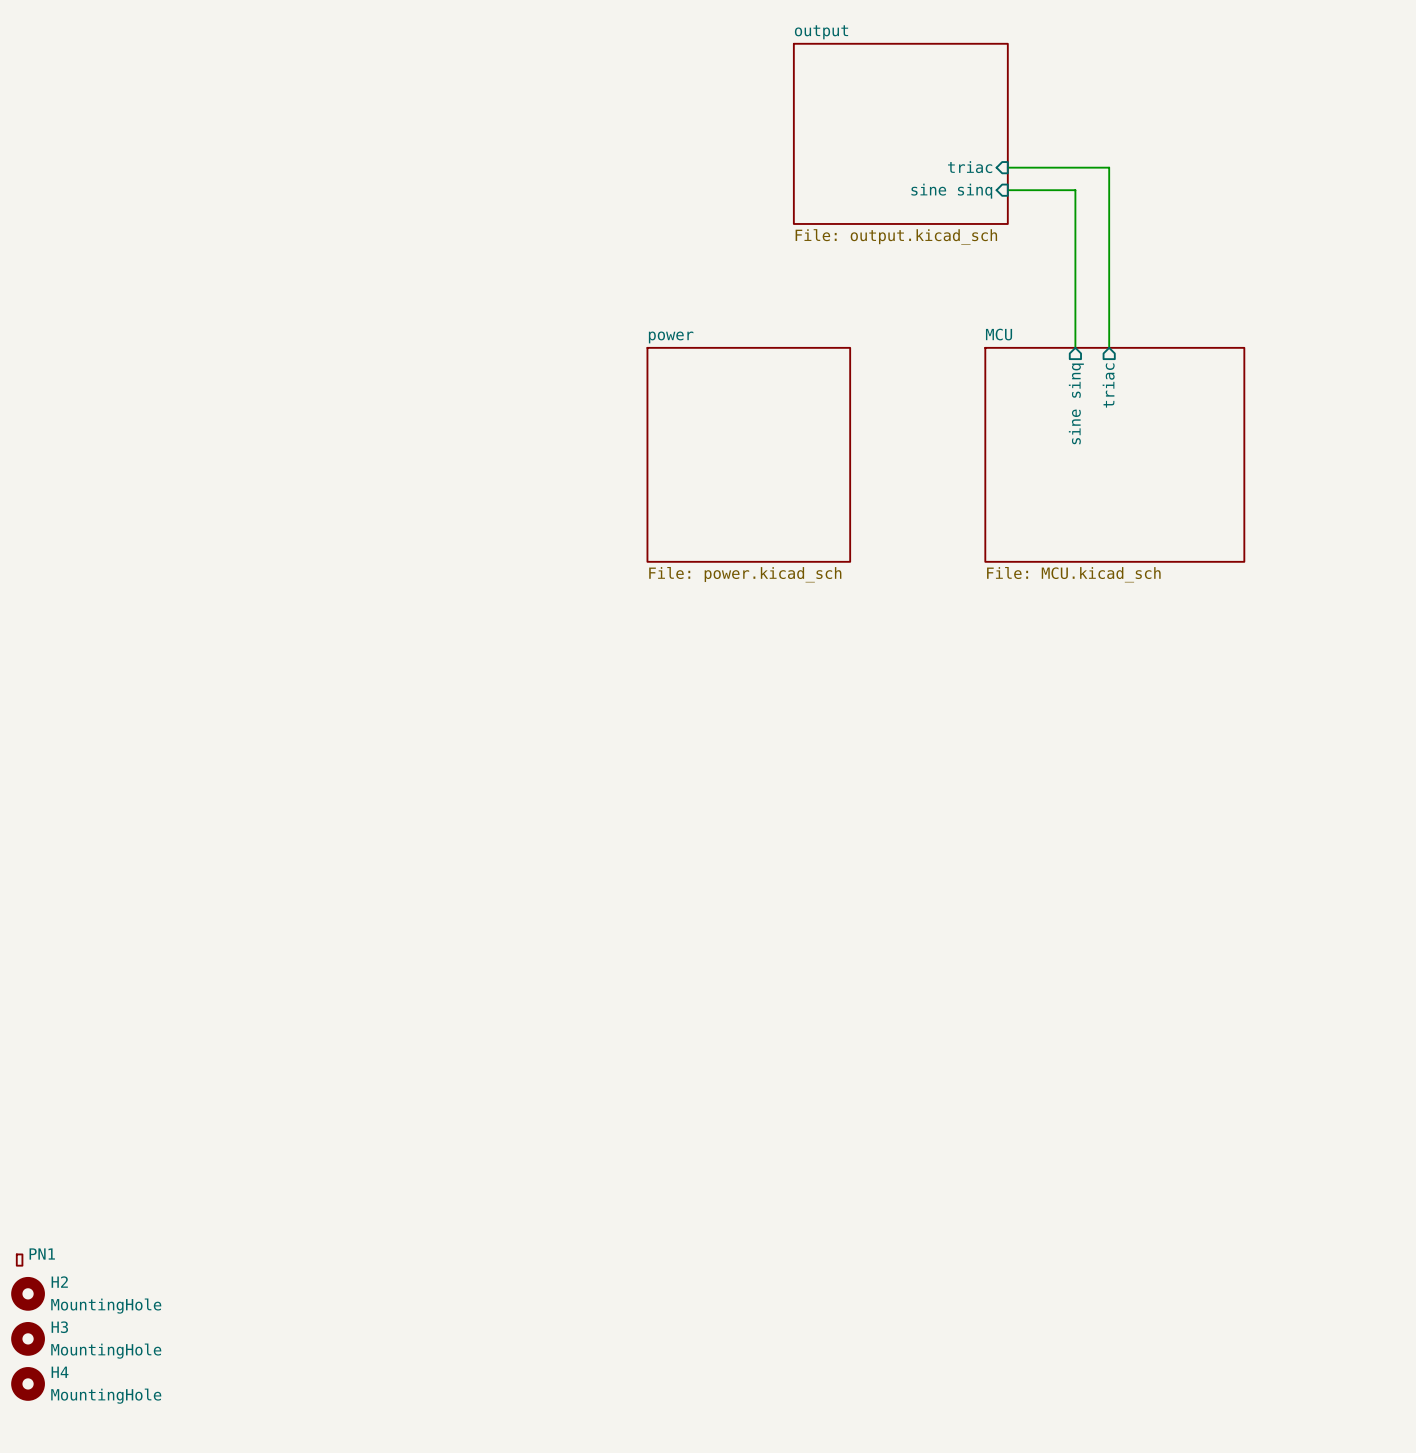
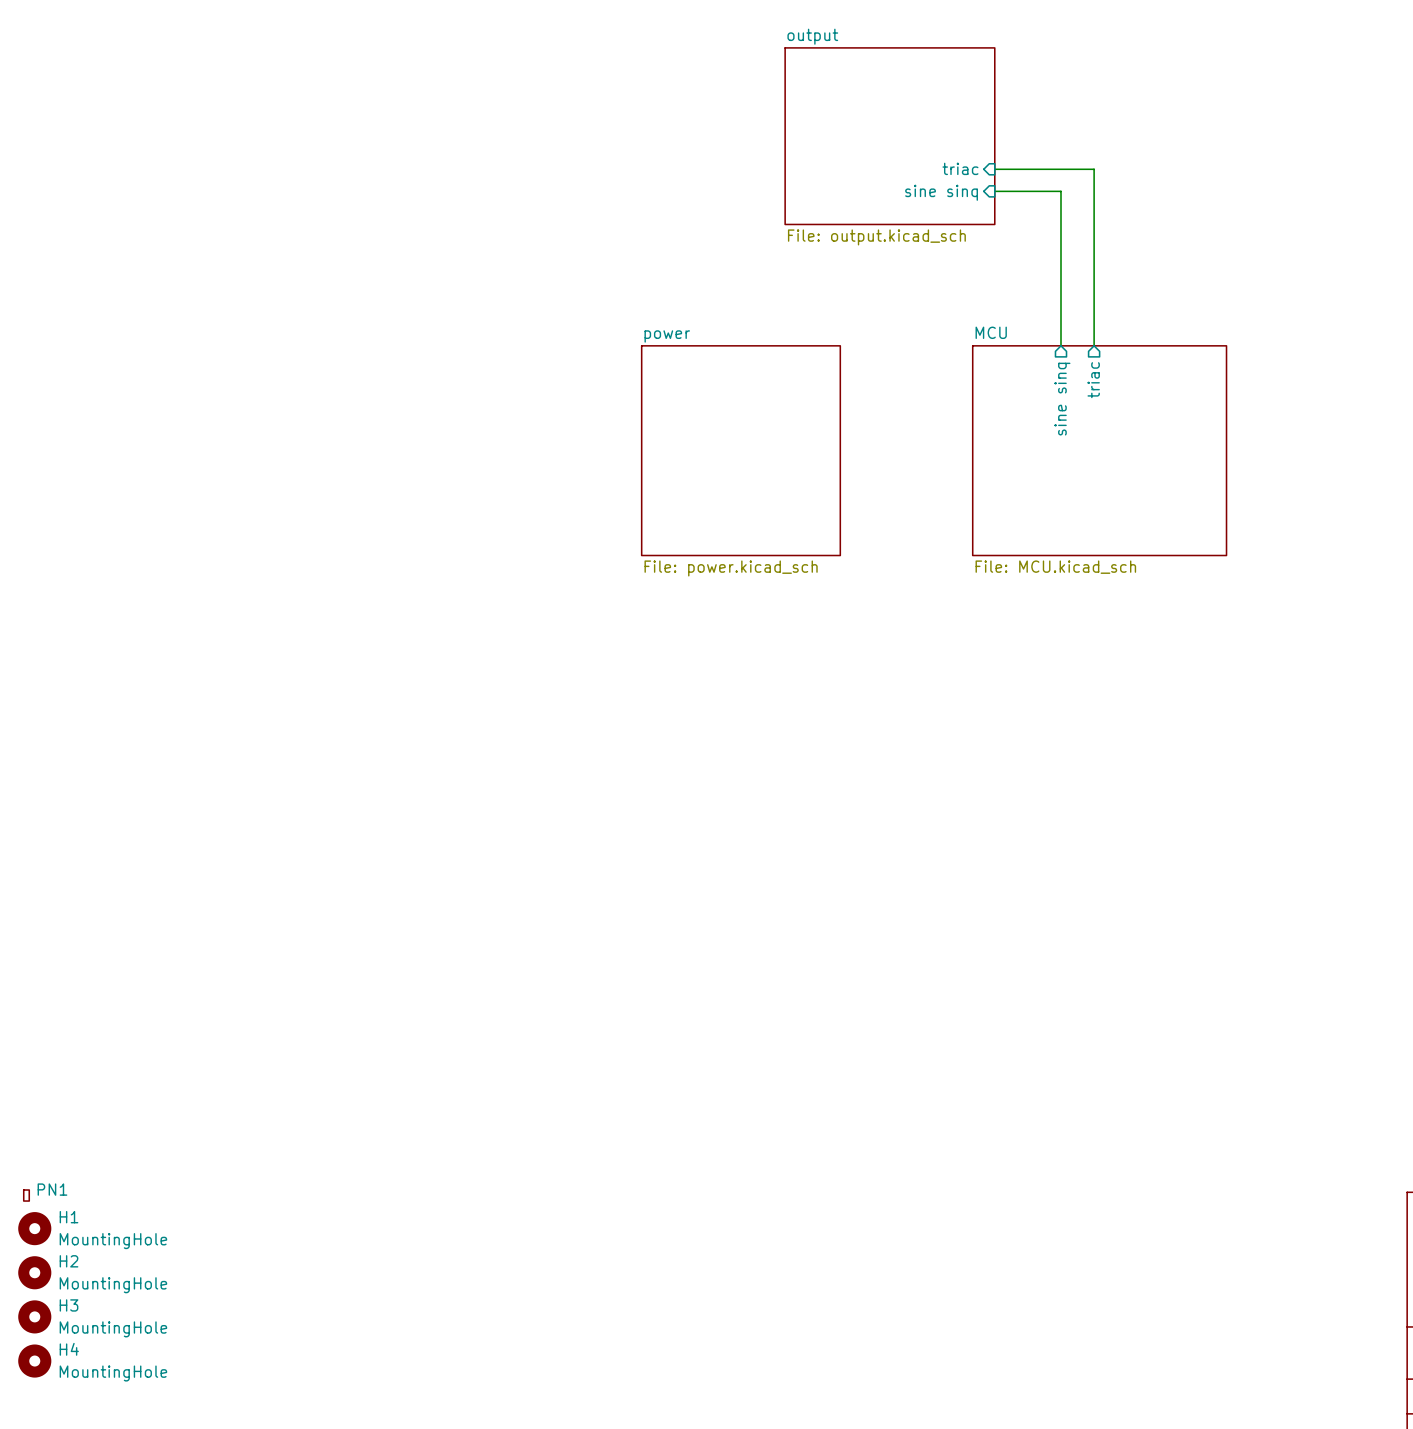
H1: none -> MountingHole (34, 1228)
PN1 position: (19, 1260) -> (26, 1195)

